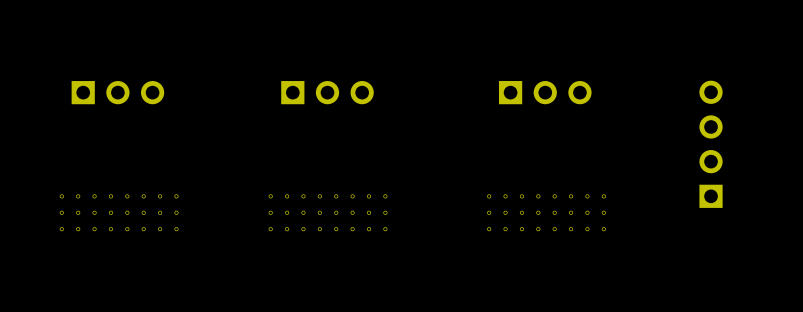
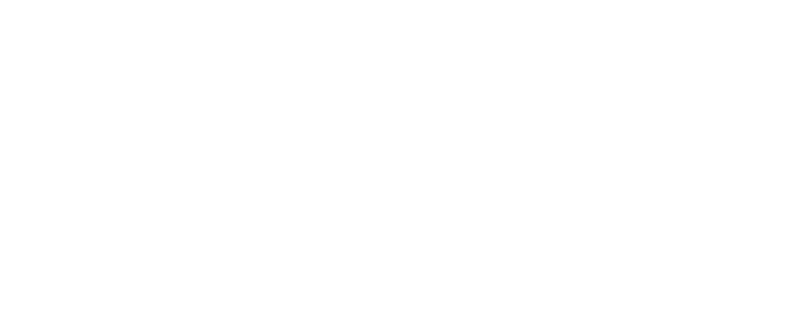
part: (117, 92) -> none
part: (327, 92) -> none
part: (545, 92) -> none
part: (711, 144) -> none
part: (119, 212) -> none
part: (328, 212) -> none
part: (546, 212) -> none

